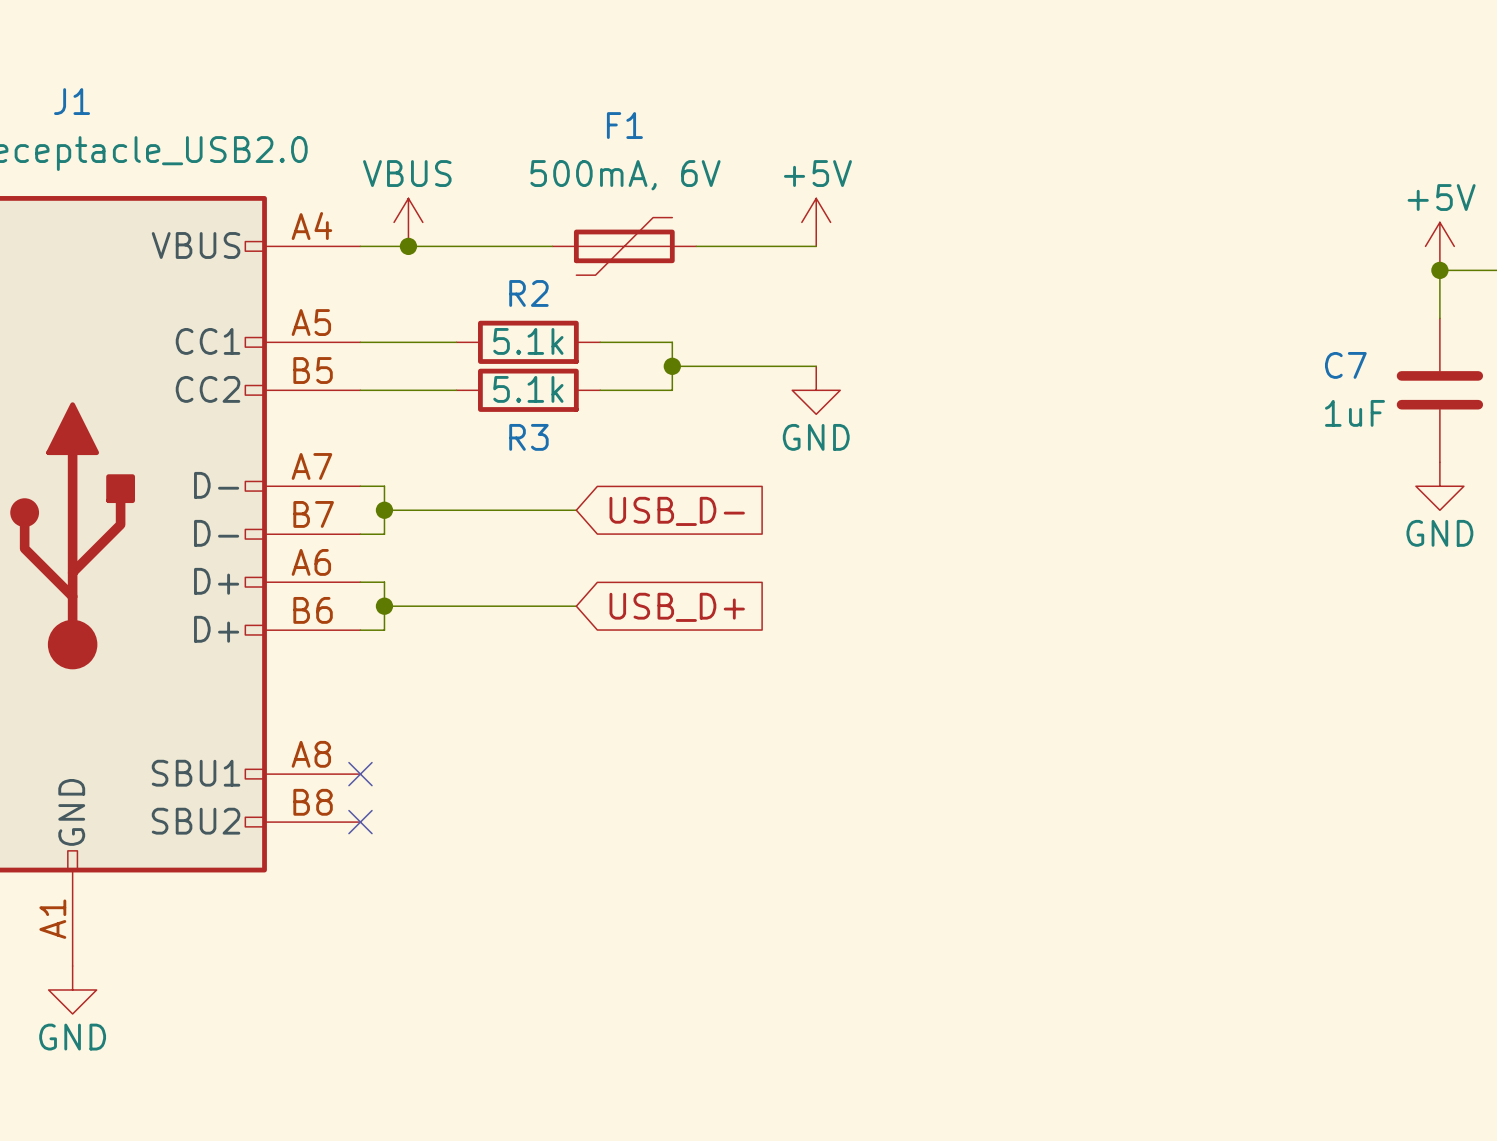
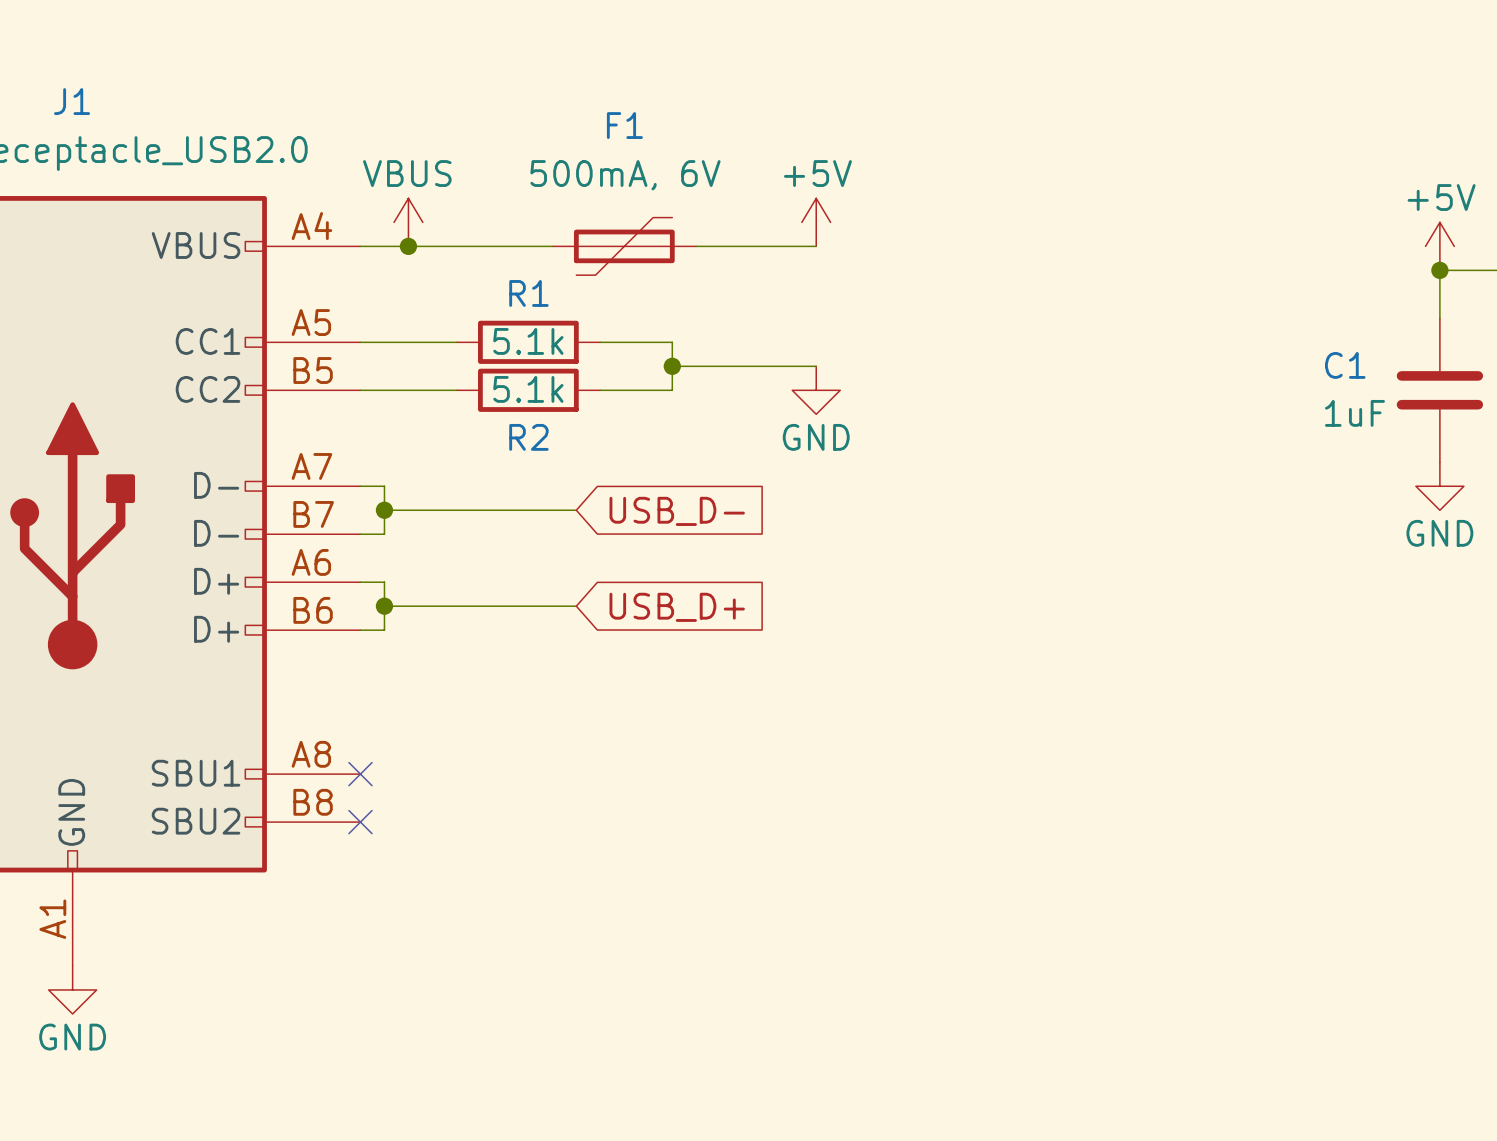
R2 name: R2 (528, 293) -> R1 (528, 293)
C7 name: C7 (1345, 365) -> C1 (1345, 365)
R3 name: R3 (528, 437) -> R2 (528, 437)

